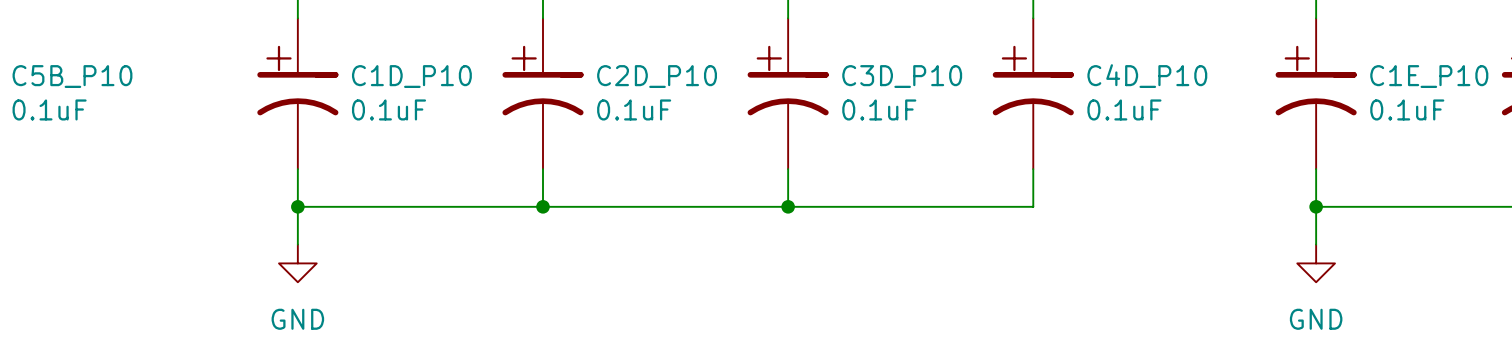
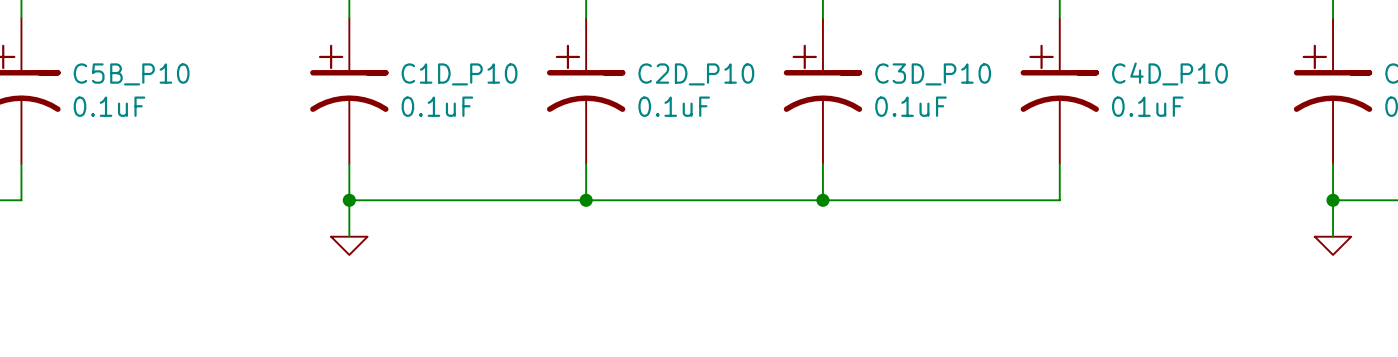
power symbol shape: [279, 244, 317, 283] -> [331, 236, 368, 255]
power symbol shape: [1297, 244, 1335, 283] -> [1314, 236, 1352, 255]
power symbol text: GND (297, 319) -> none
power symbol text: GND (1316, 319) -> none

